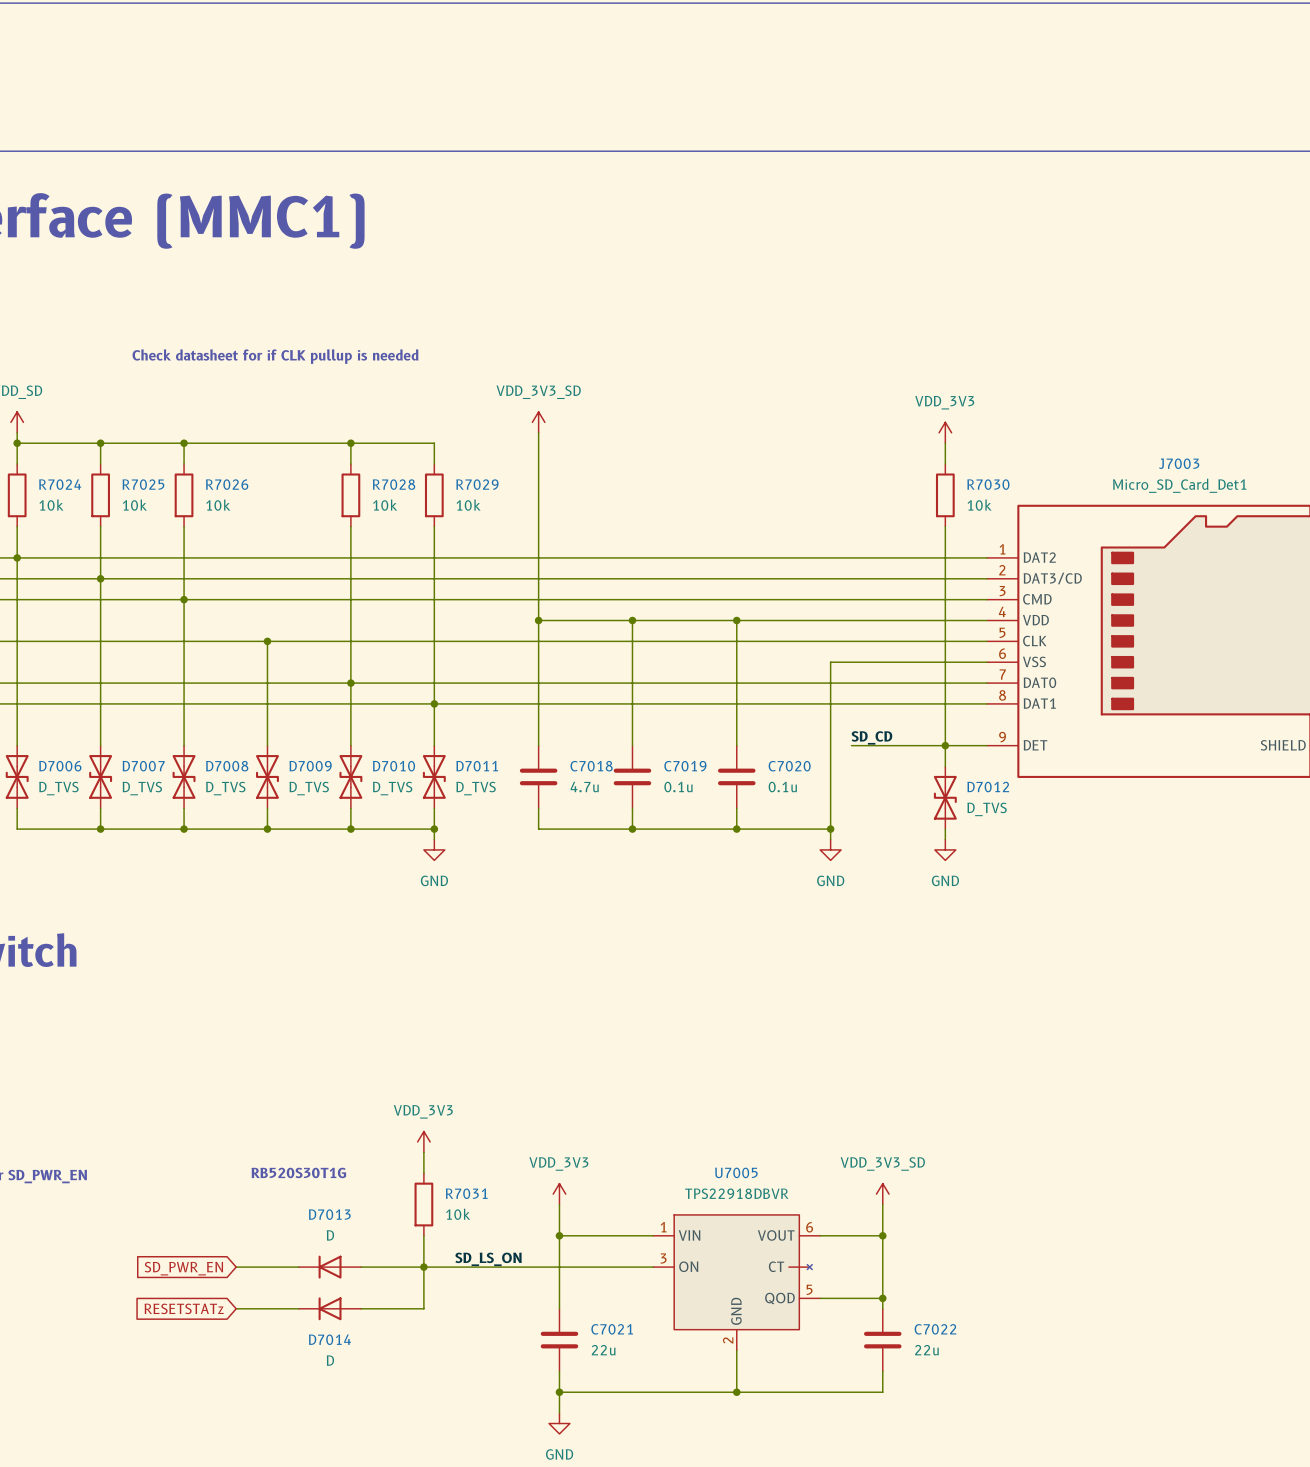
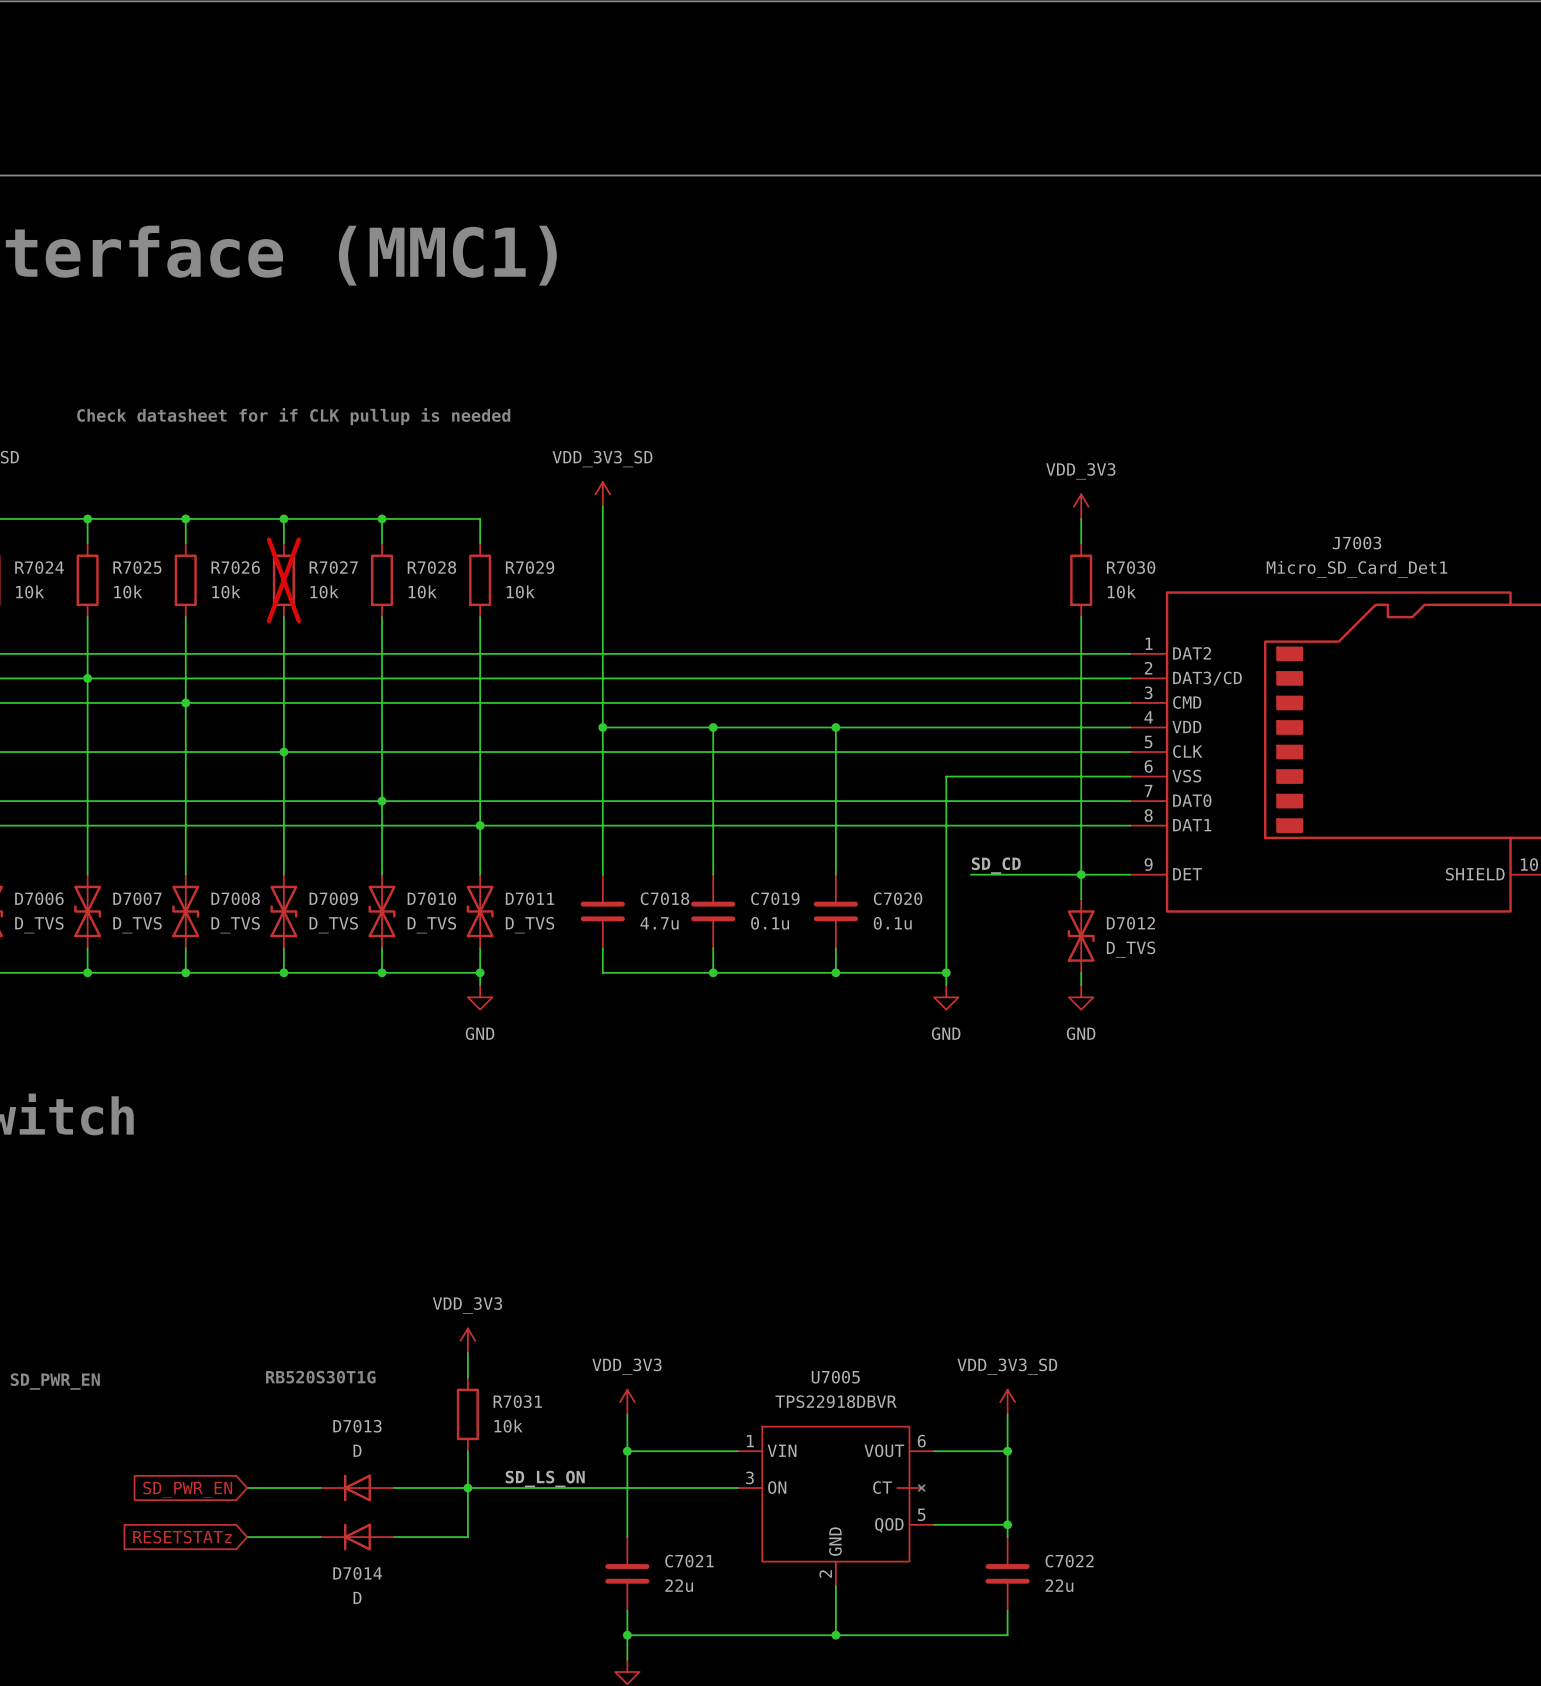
wire: none -> (283, 518) (283, 543)
junction: none -> (283, 518)
R7027: none -> 10k (283, 580)
wire: none -> (283, 617) (283, 752)

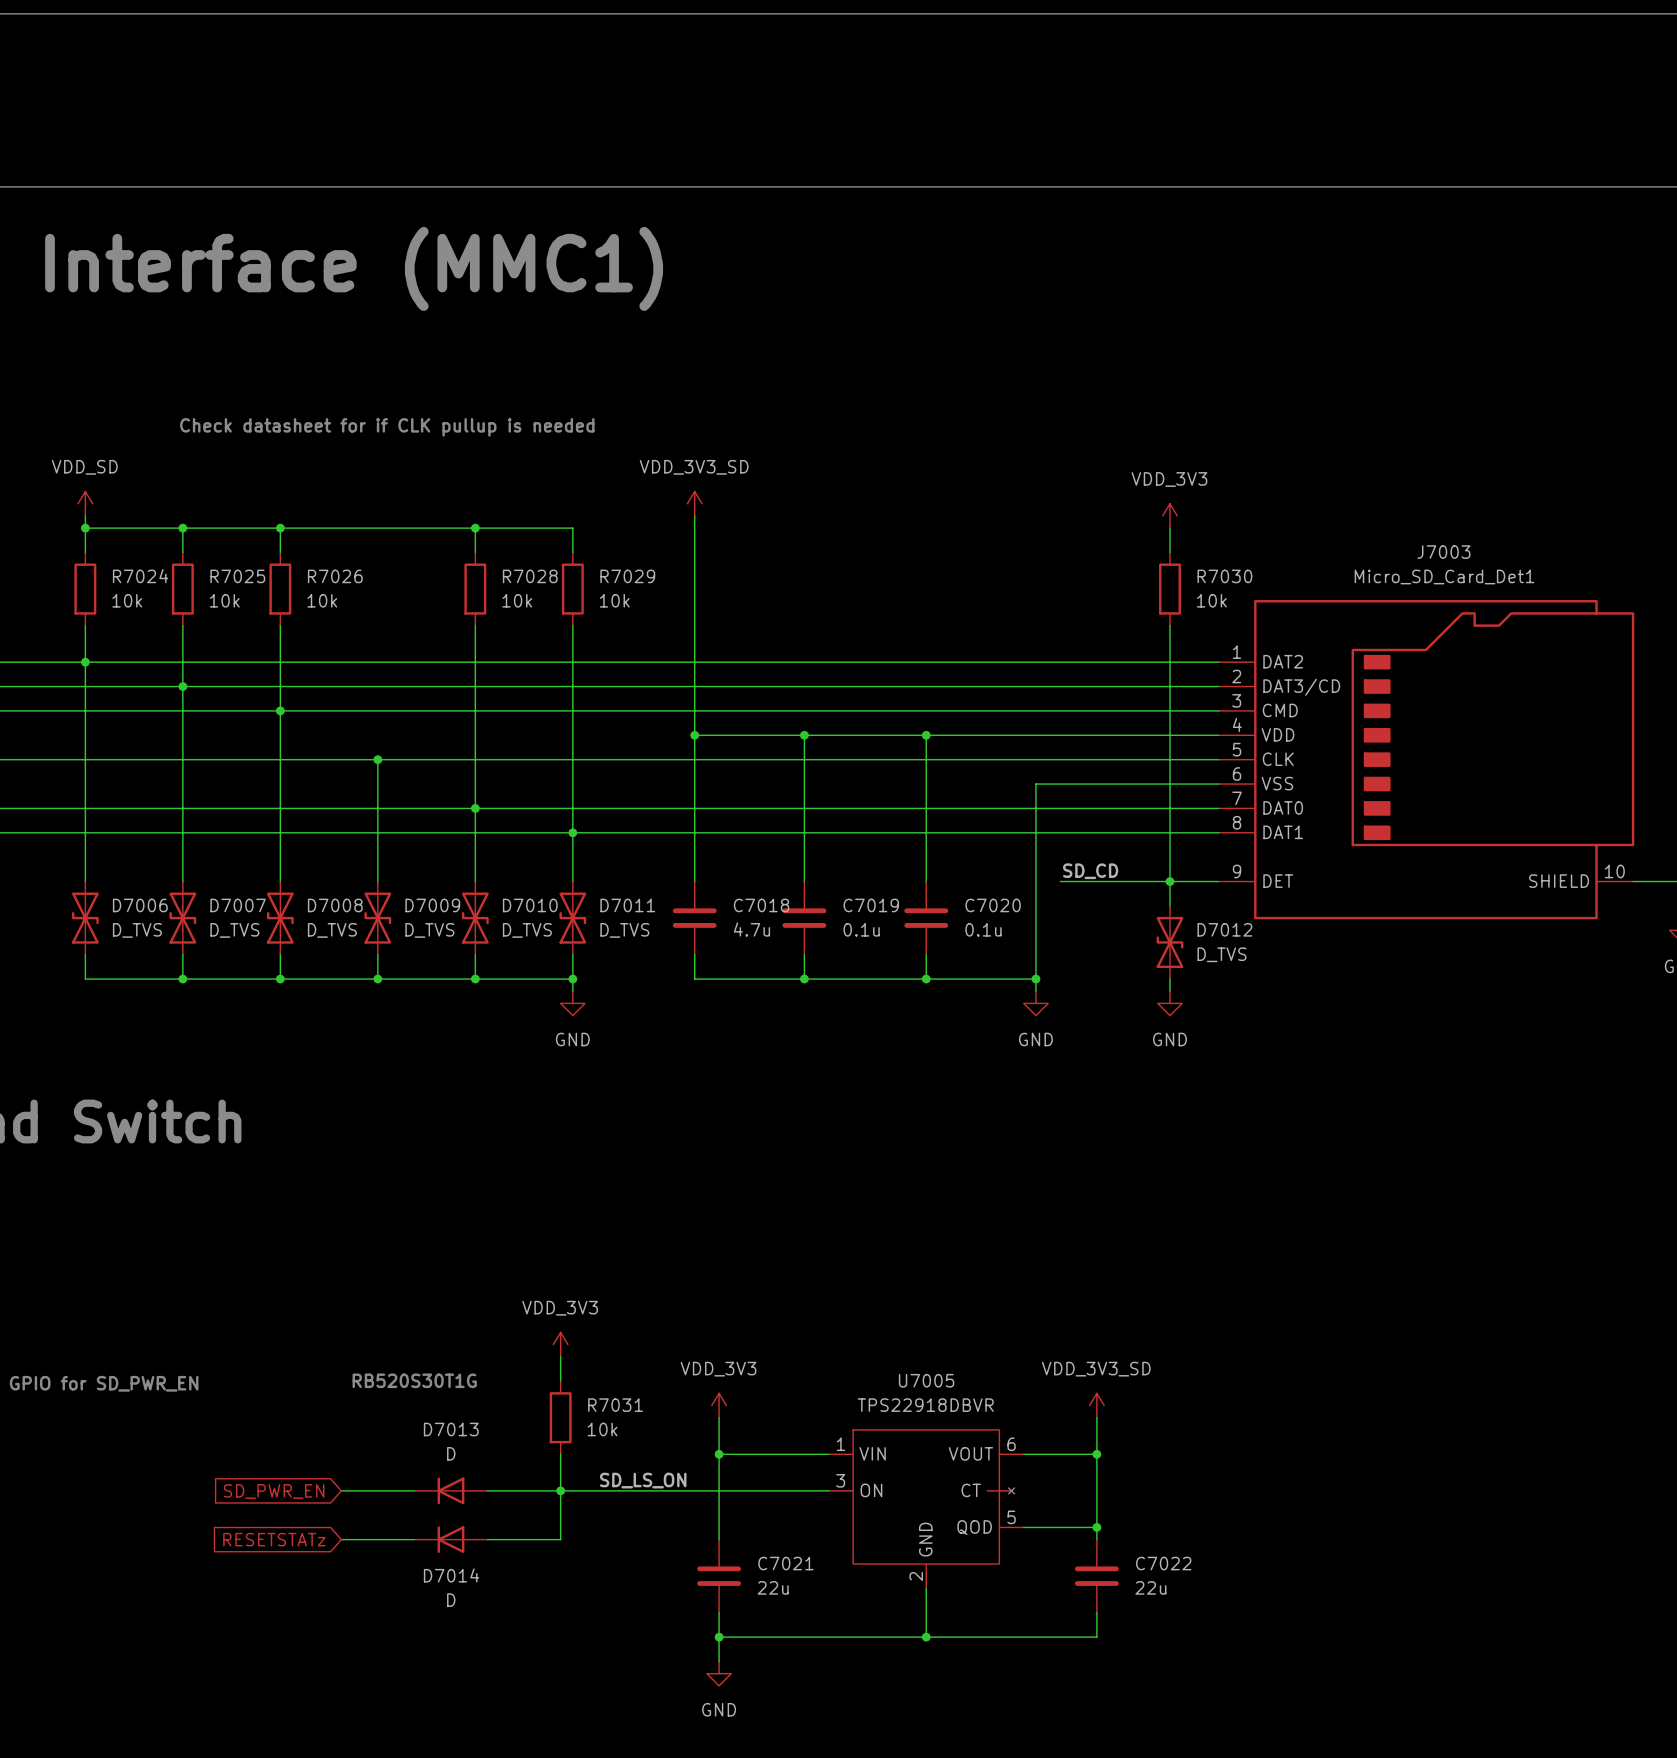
wire: (283, 518) (283, 543) -> none
junction: (283, 518) -> none
R7027: 10k (283, 580) -> none
wire: (283, 617) (283, 752) -> none

